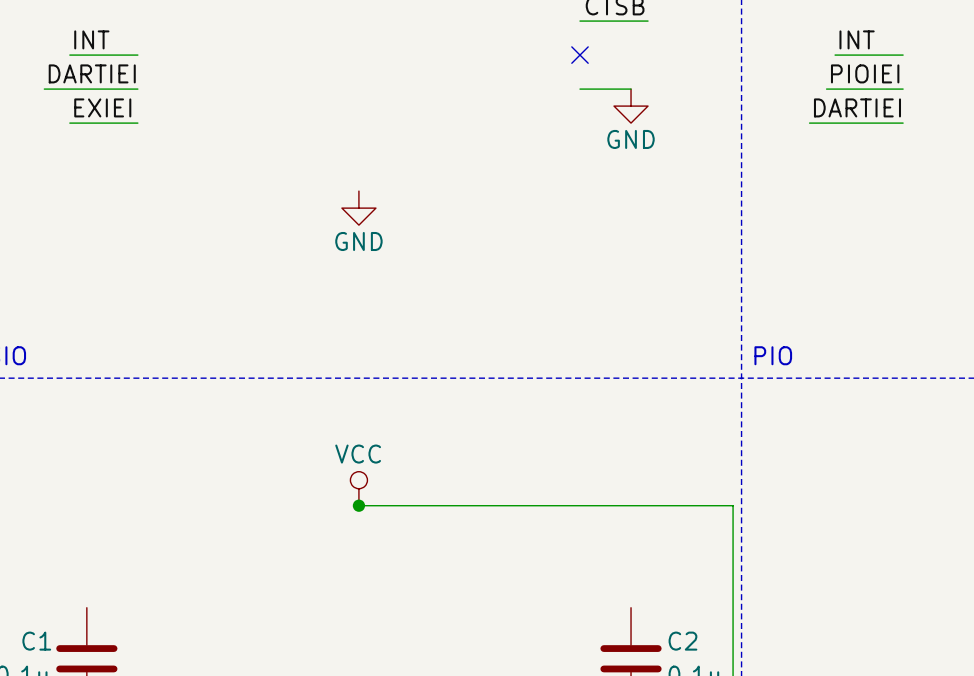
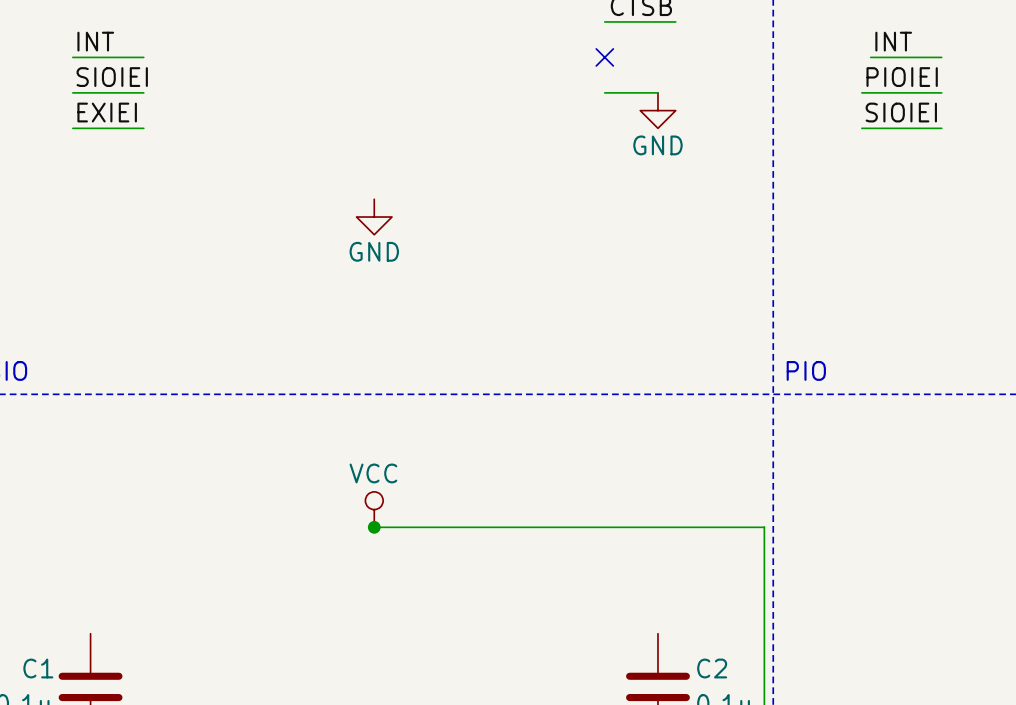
label: DARTIEI (92, 73) -> none
label: none -> SIOIEI (112, 77)
wire: (44, 89) (69, 89) -> none
label: DARTIEI (857, 107) -> none
label: none -> SIOIEI (901, 112)
wire: (809, 123) (826, 123) -> none

